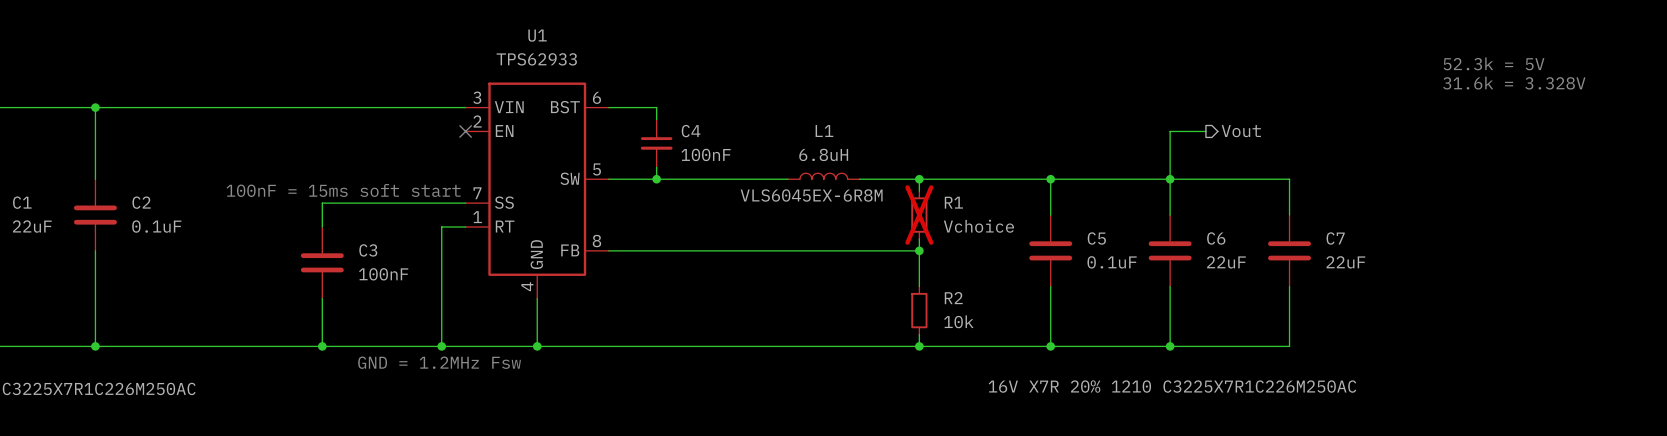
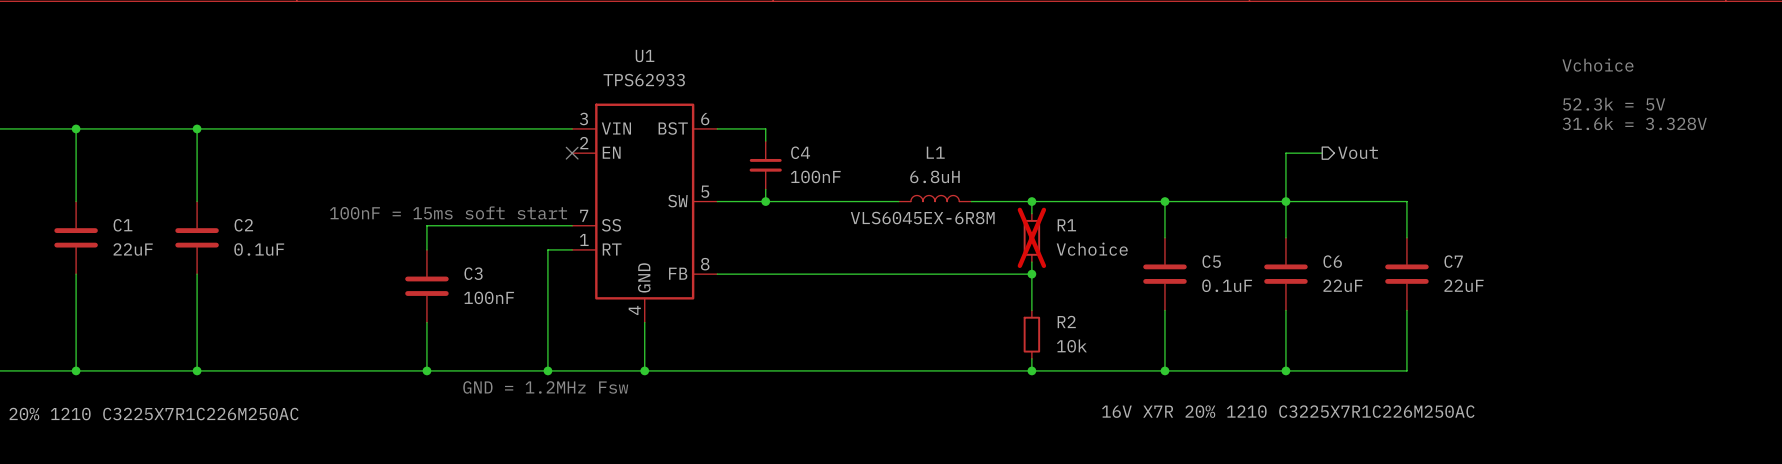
text: none -> Vchoice (1597, 65)
text: 52.3k = 5V (1494, 63) -> none
text: 31.6k = 3.328V (1514, 83) -> 52.3k = 5V (1614, 104)
text: none -> 31.6k = 3.328V (1634, 123)

